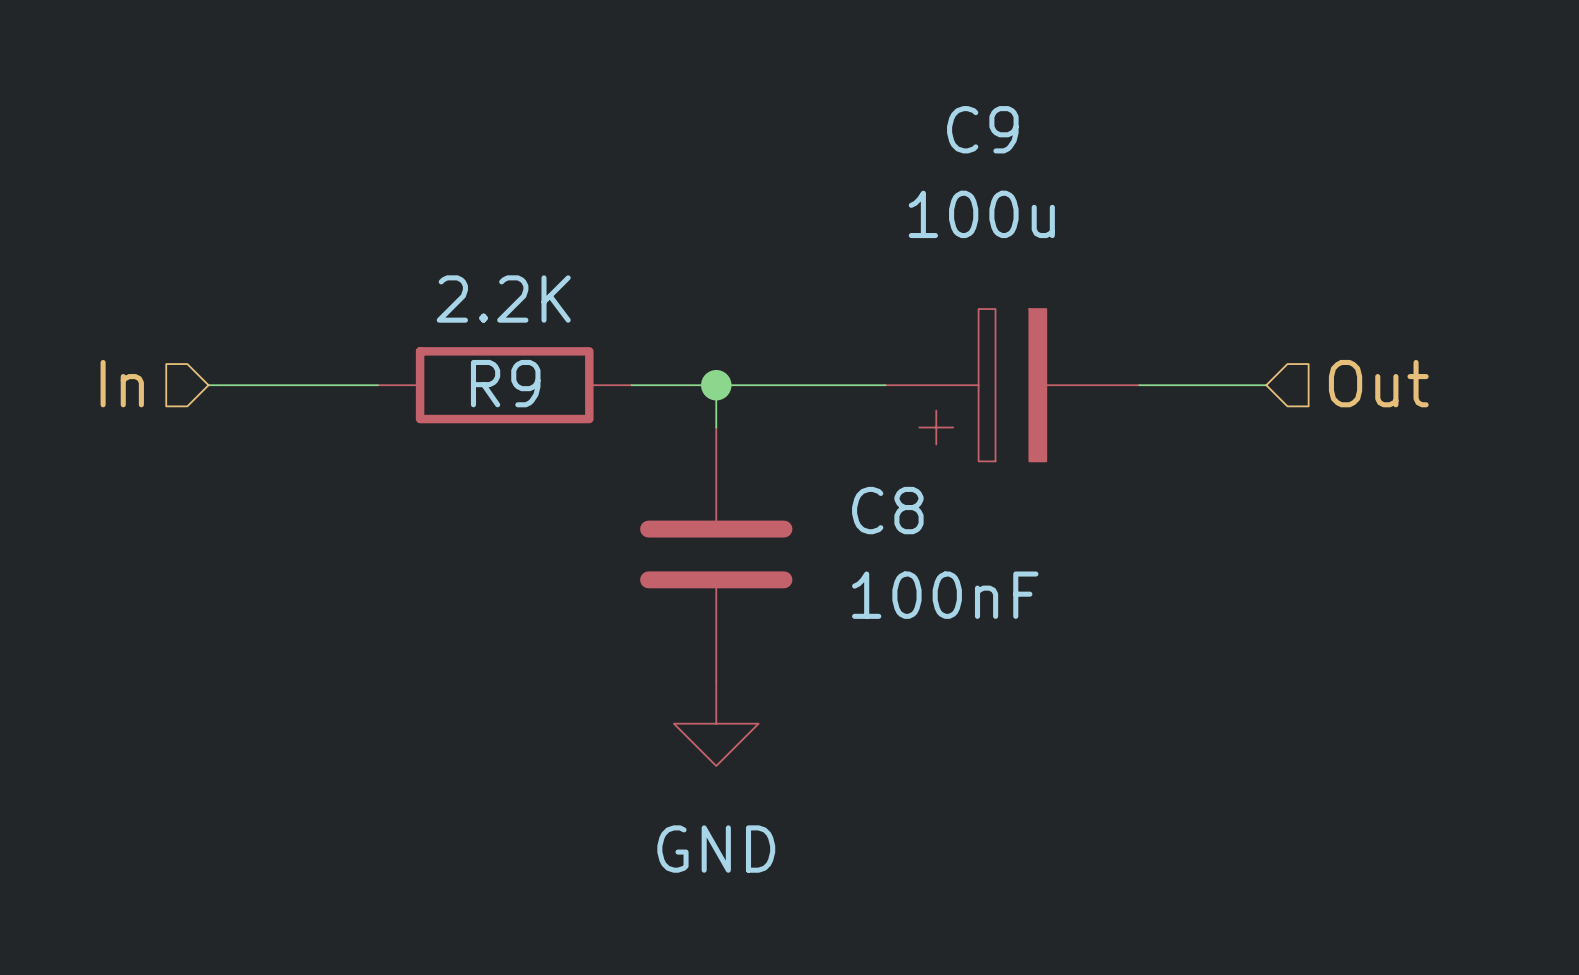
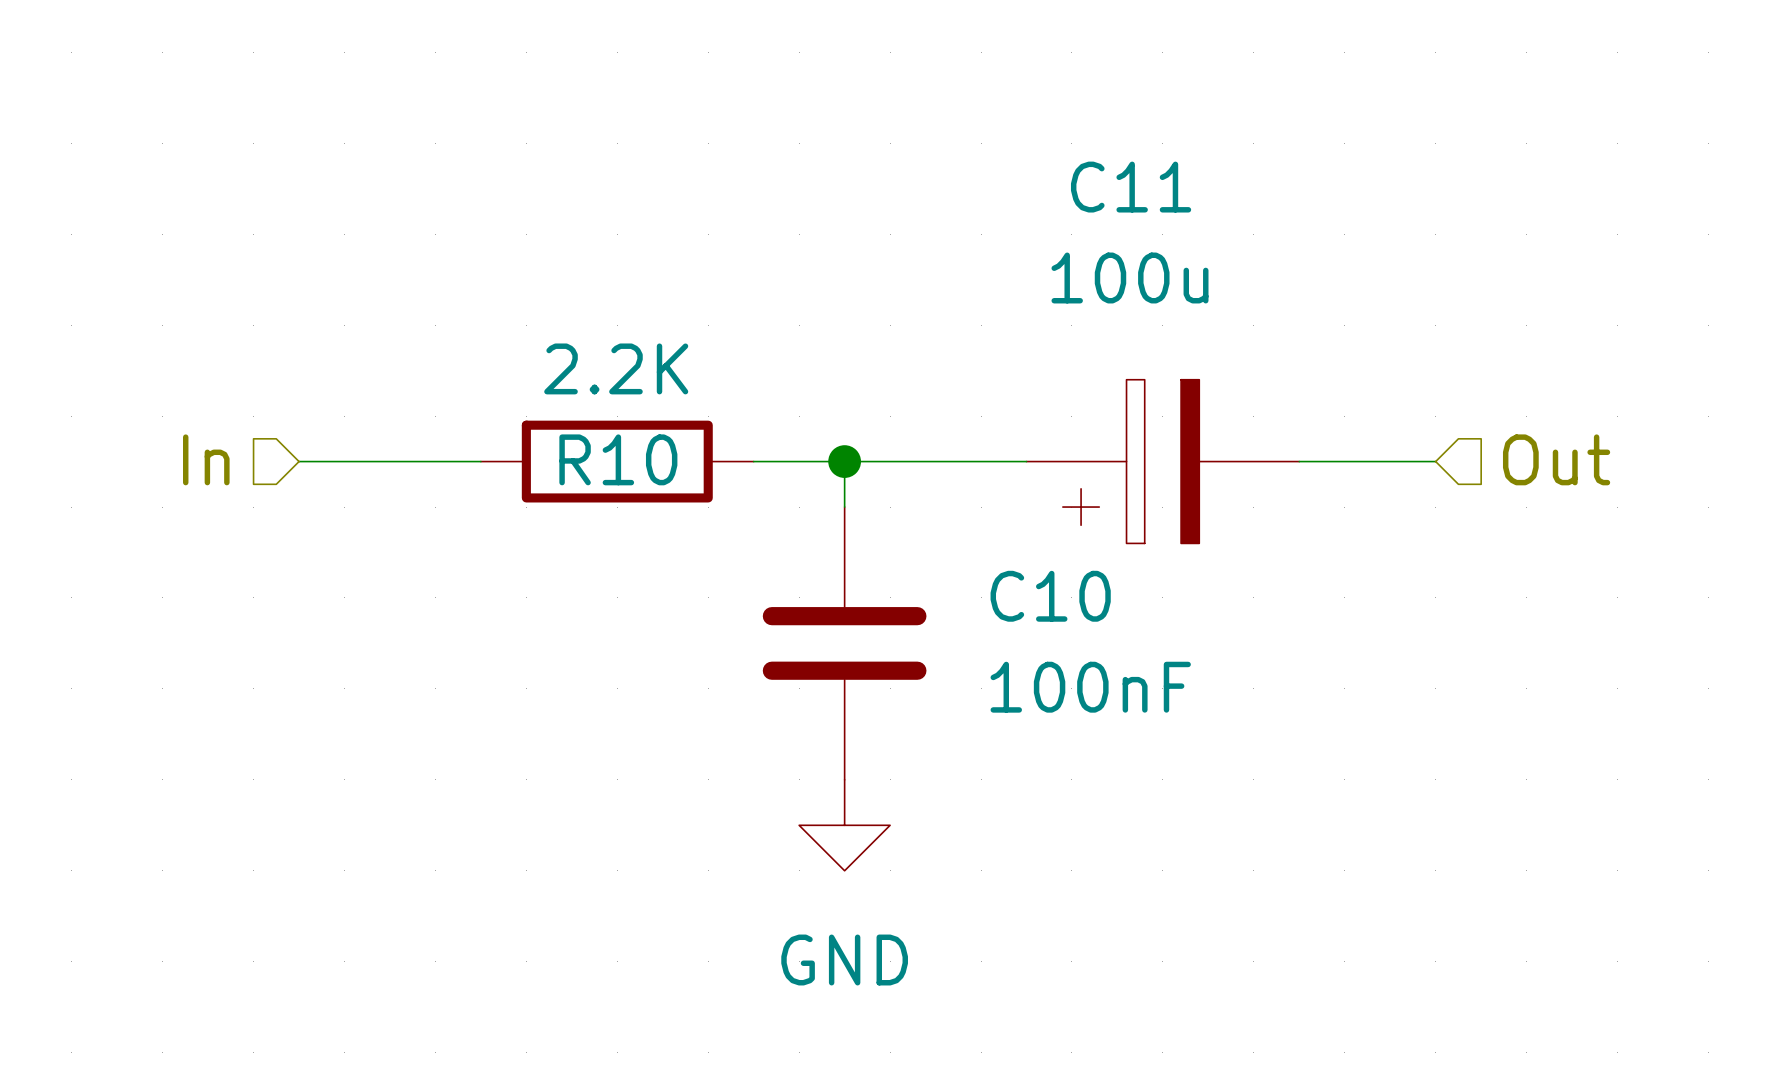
C9 name: C9 (982, 129) -> C11 (1131, 187)
R9 name: R9 (505, 383) -> R10 (618, 459)
C8 name: C8 (887, 510) -> C10 (1050, 596)

